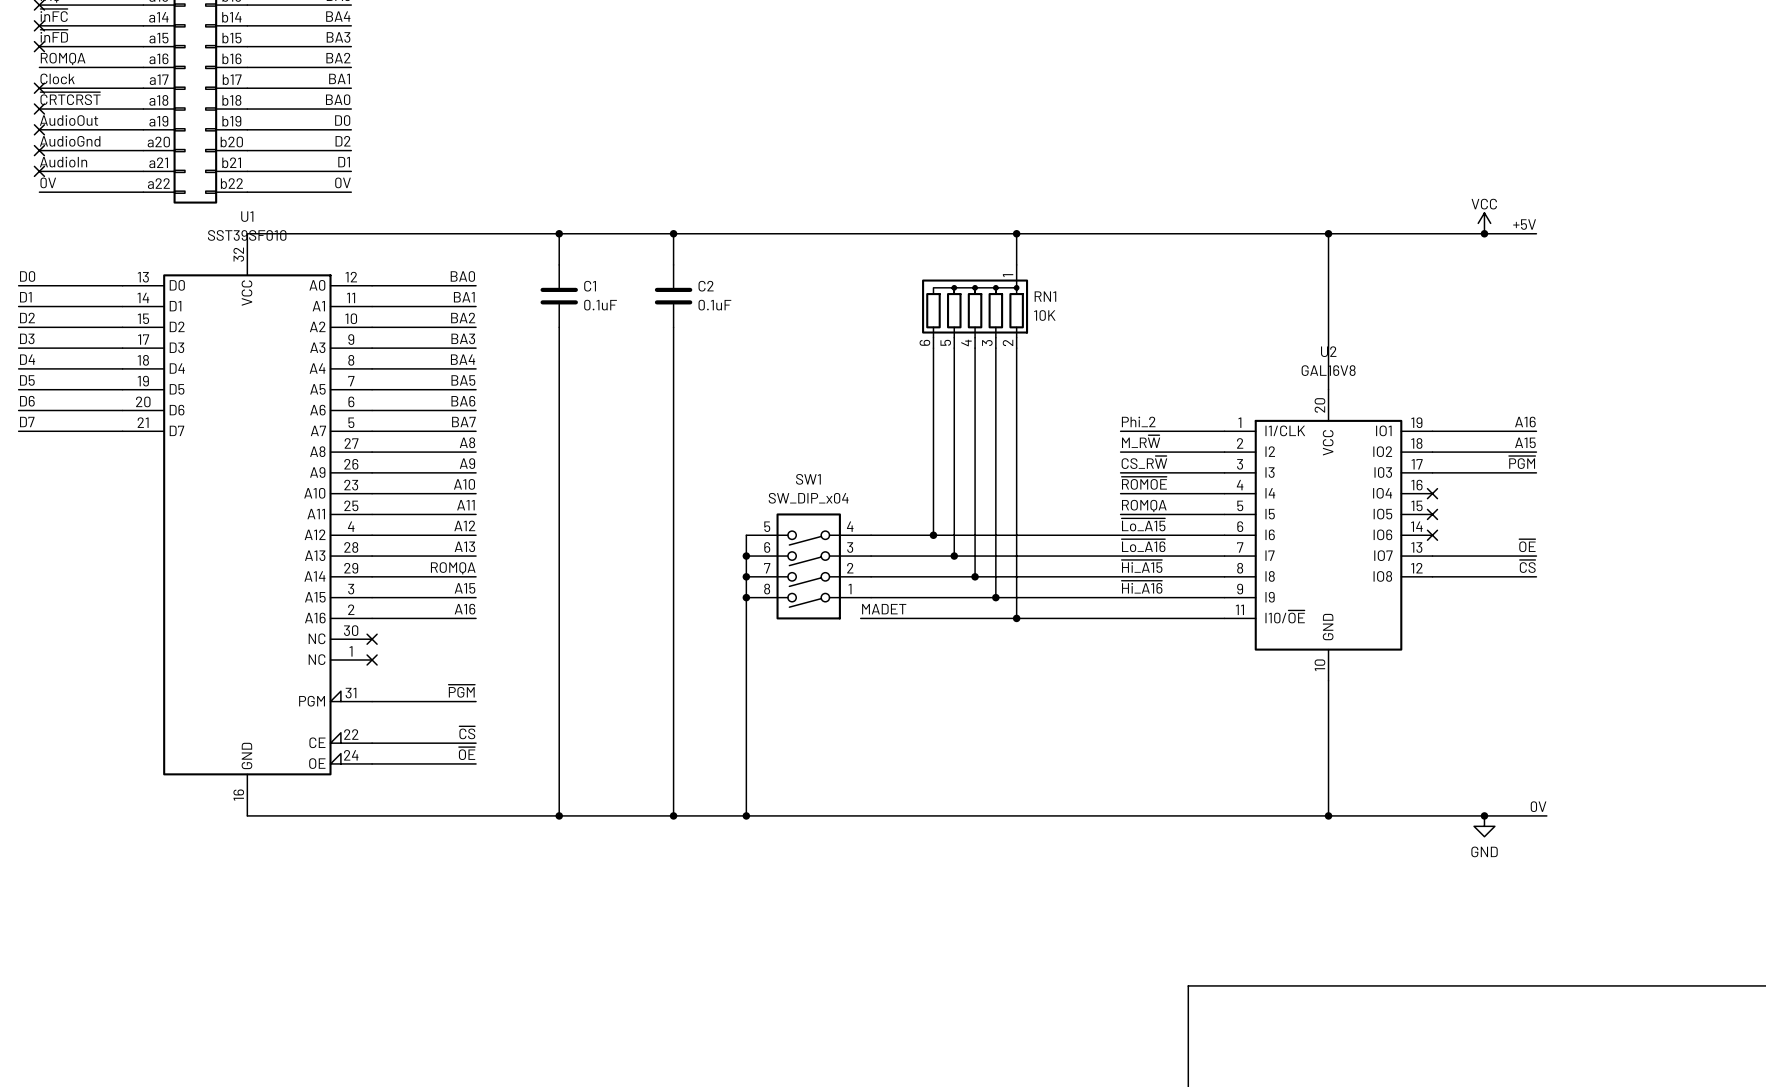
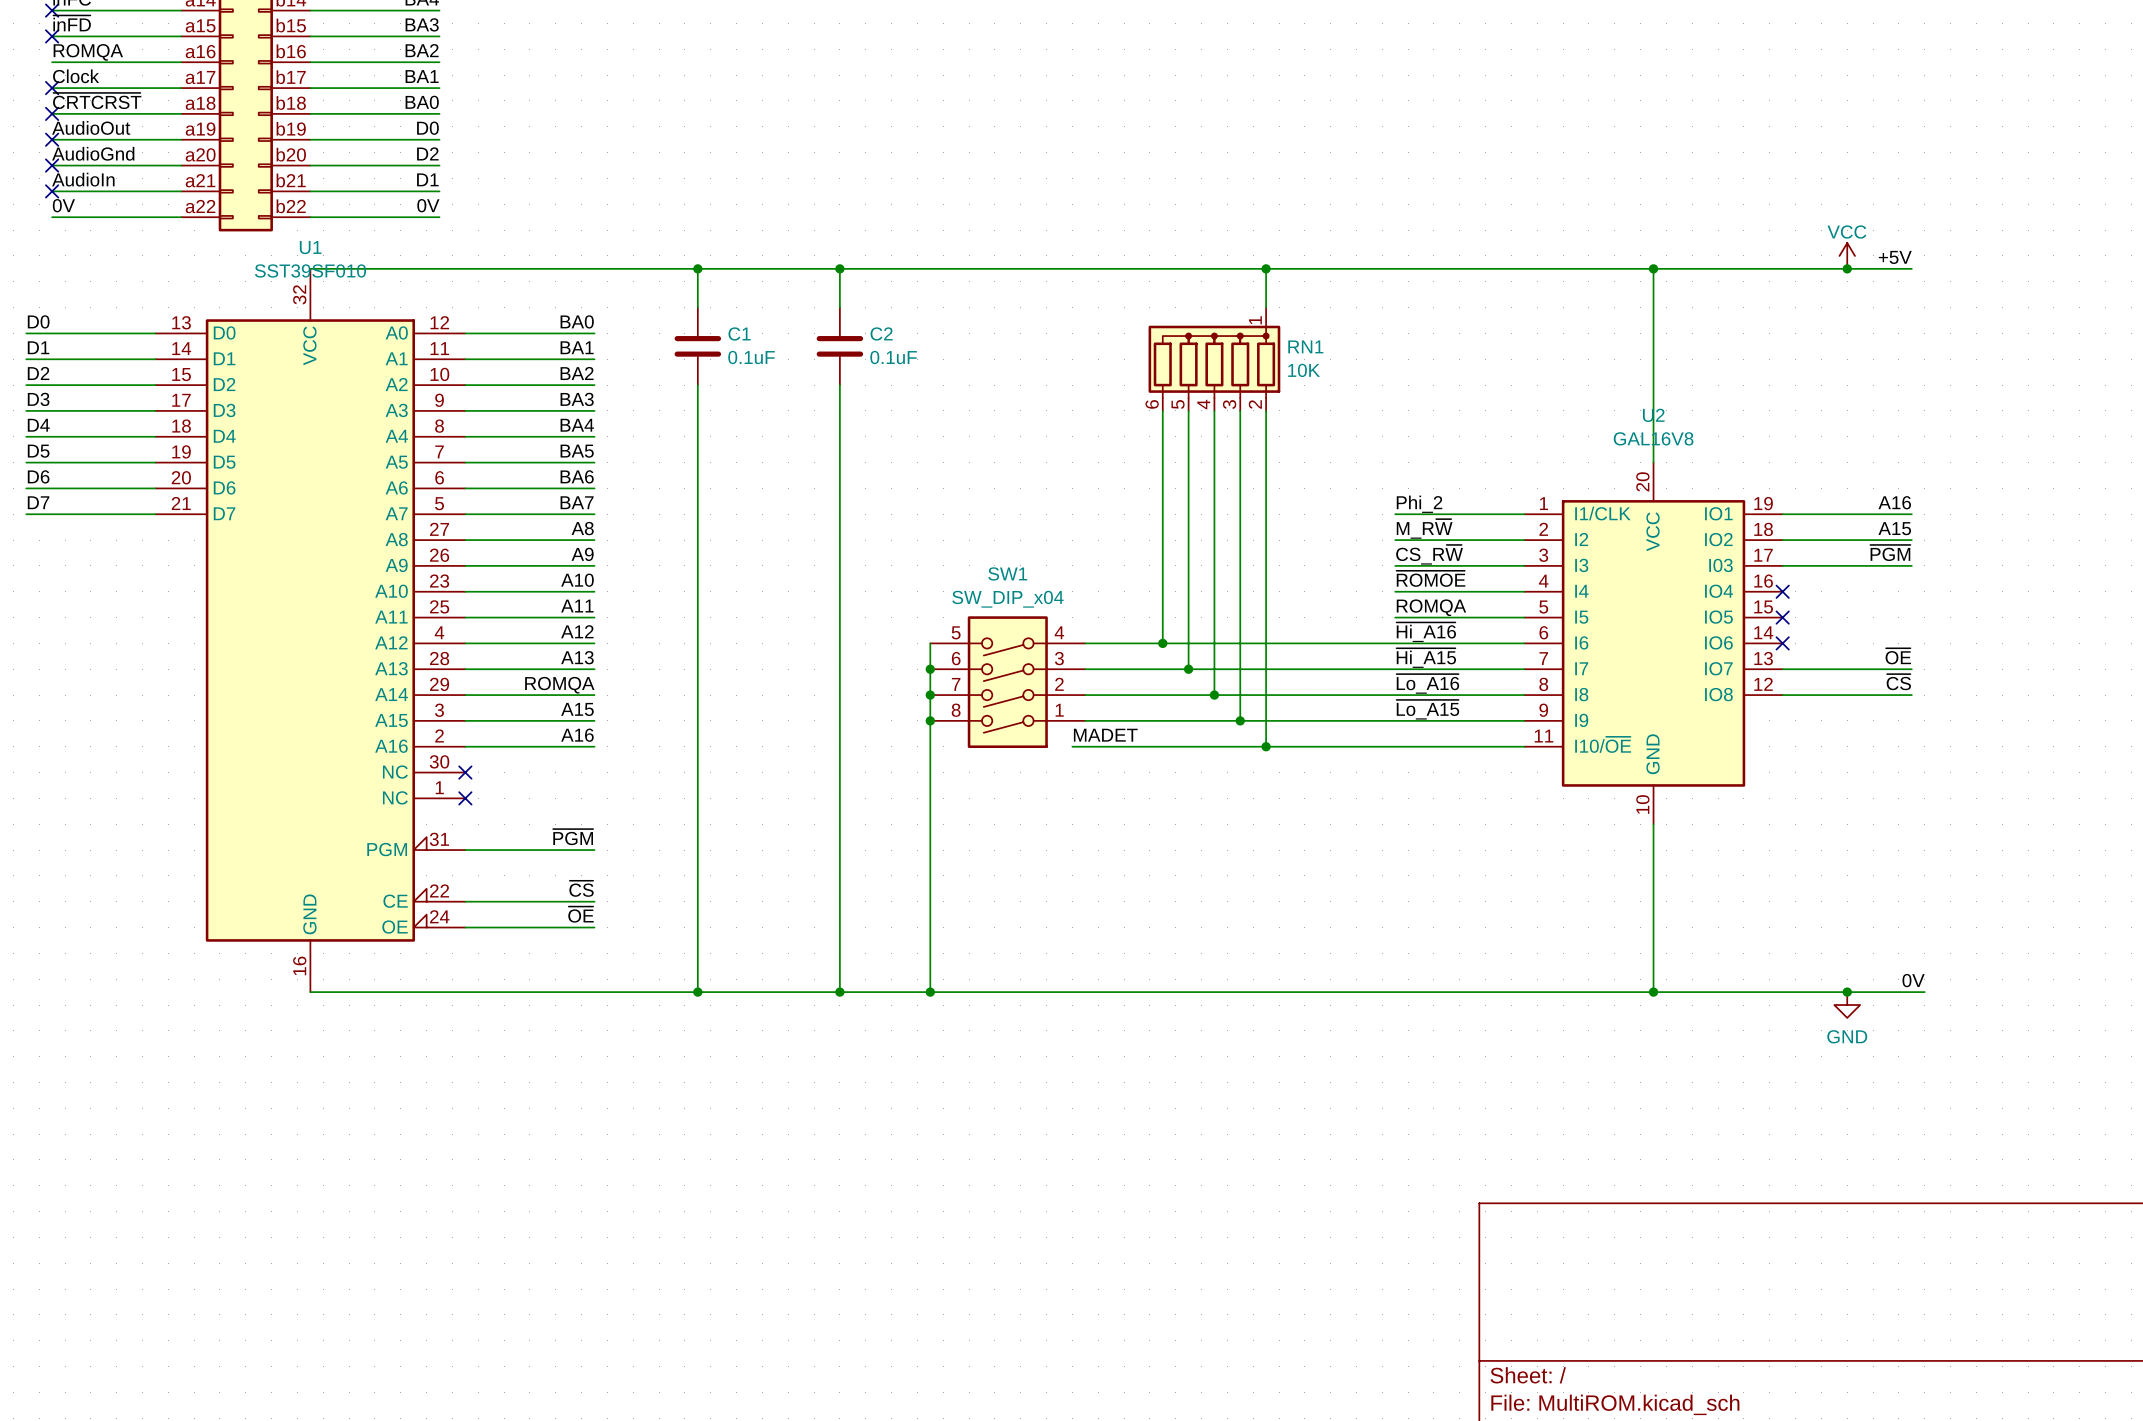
label: ~{Lo_A15} (1143, 524) -> ~{Hi_A16} (1426, 632)
label: ~{Lo_A16} (1143, 545) -> ~{Hi_A15} (1426, 658)
label: ~{Hi_A15} (1142, 566) -> ~{Lo_A16} (1427, 683)
label: ~{Hi_A16} (1142, 587) -> ~{Lo_A15} (1427, 709)

